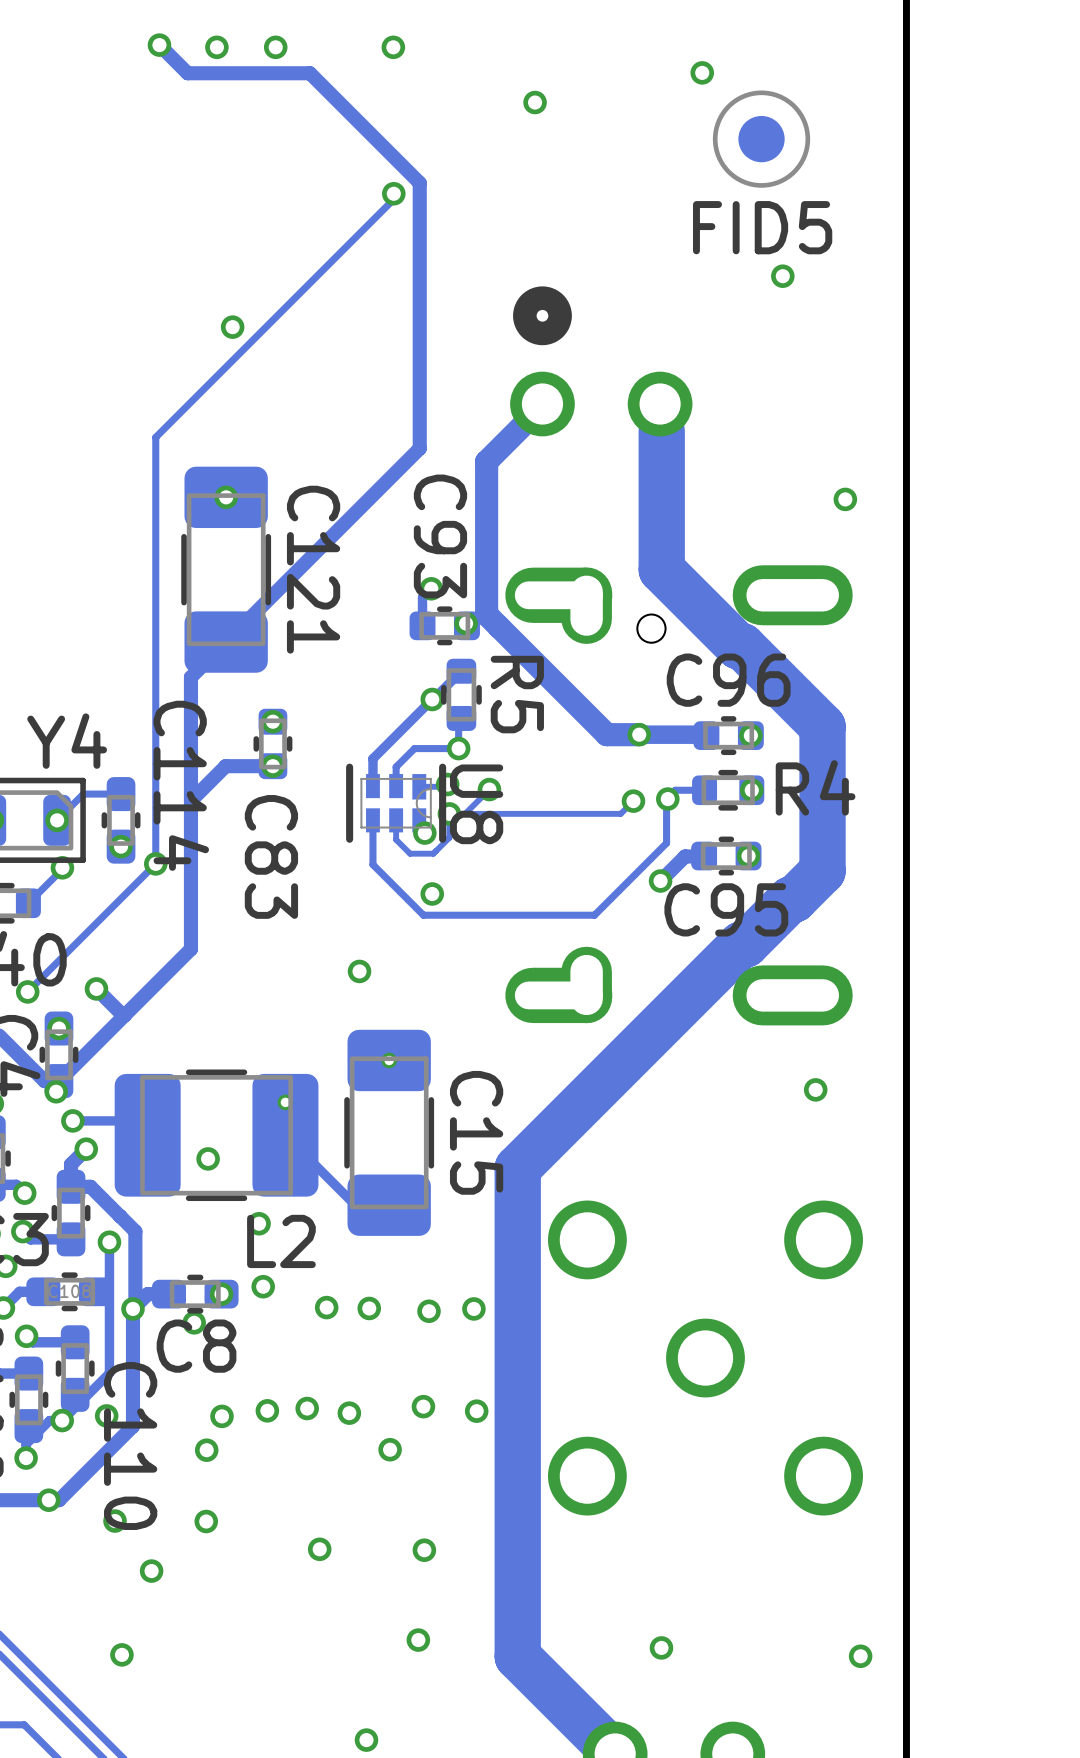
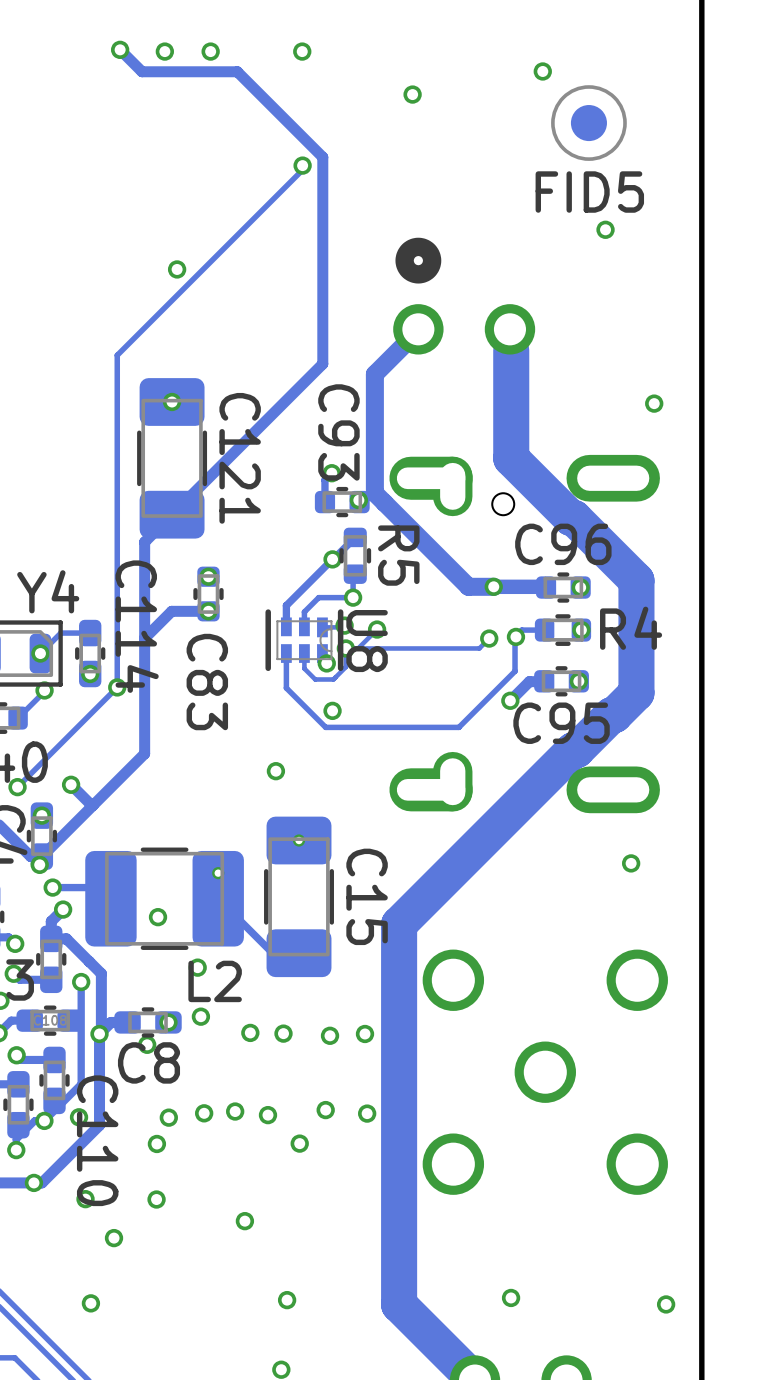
via: (424, 1550) -> none
via position: (418, 1640) -> (287, 1300)

